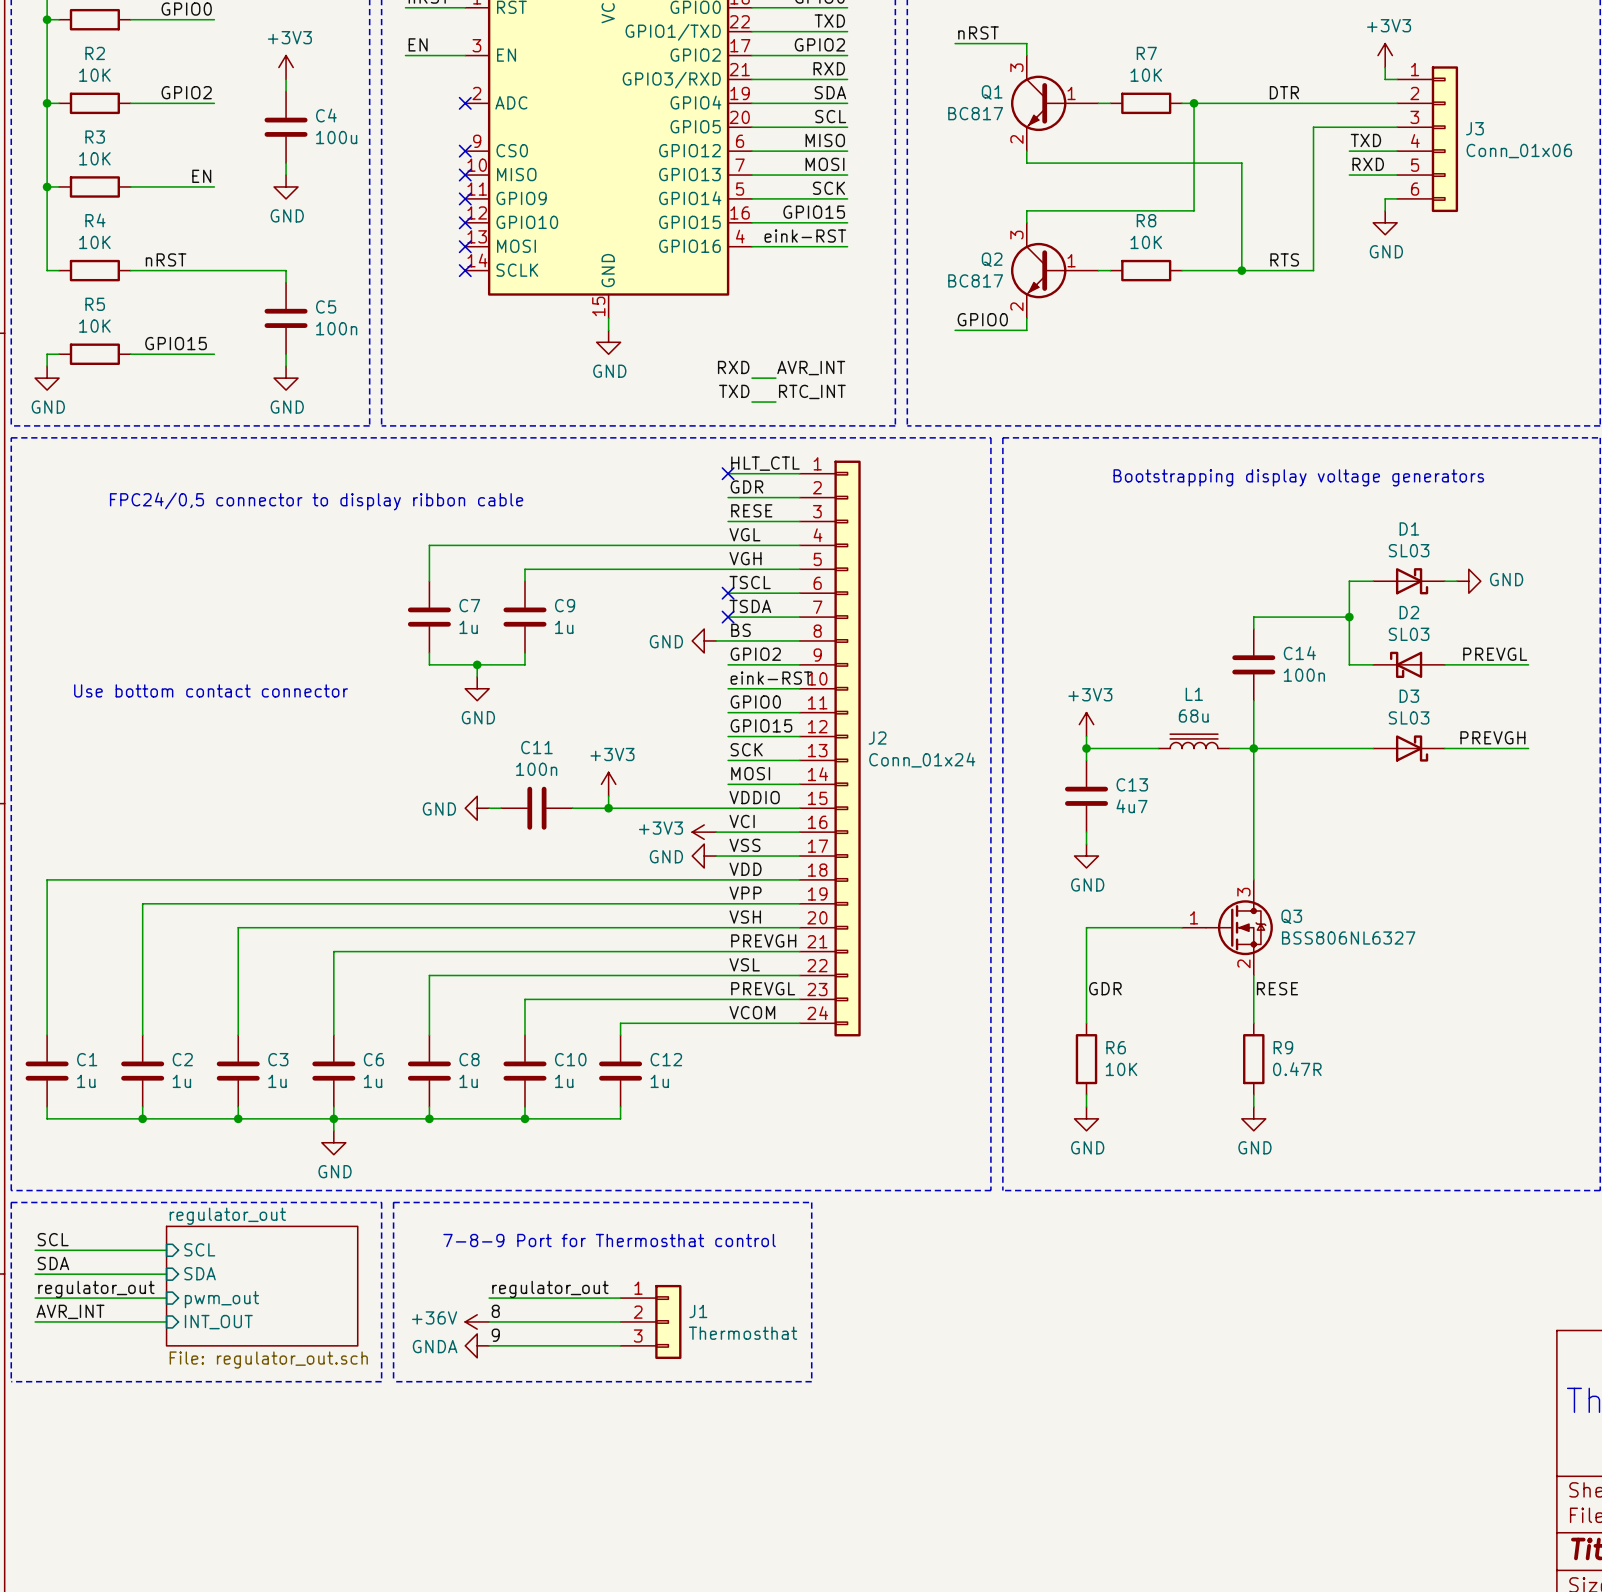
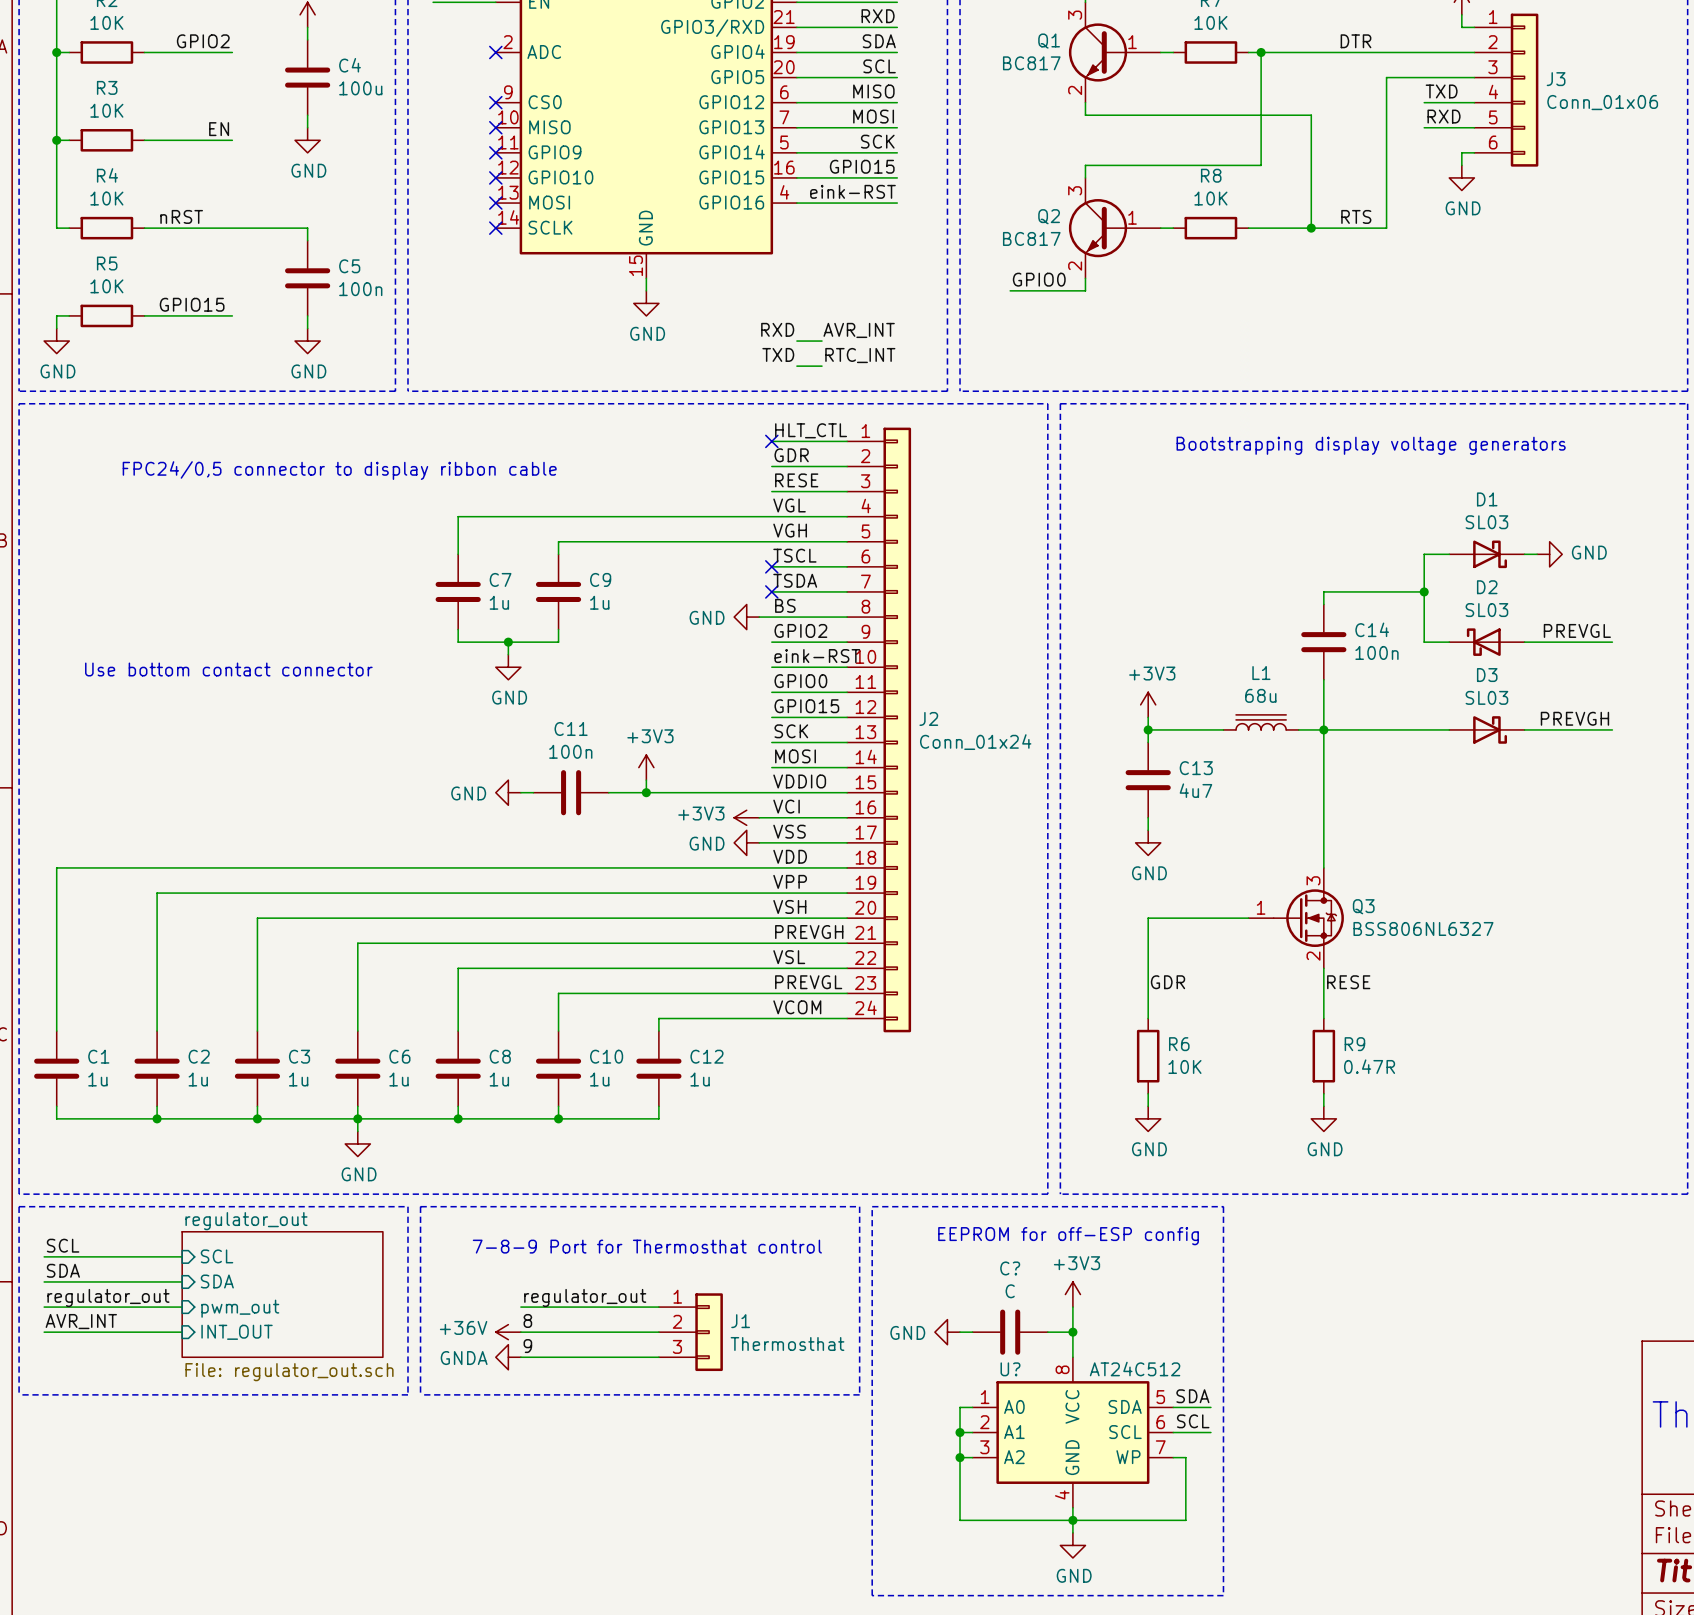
line: none -> (872, 1206) (872, 1595) (1223, 1595) (1223, 1206) (872, 1206)
text: none -> EEPROM for off-ESP config (1068, 1236)
power symbol: none -> +3V3 (1072, 1294)
wire: none -> (1072, 1307) (1072, 1357)
power symbol: none -> GND (947, 1332)
wire: none -> (960, 1332) (972, 1332)
C?: none -> C (1010, 1332)
wire: none -> (1047, 1332) (1072, 1332)
junction: none -> (1072, 1332)
label: none -> SDA (1192, 1396)
wire: none -> (972, 1407) (960, 1407) (960, 1520) (1185, 1520) (1185, 1457) (1173, 1457)
wire: none -> (1173, 1407) (1210, 1407)
label: none -> SCL (1193, 1421)
wire: none -> (960, 1432) (972, 1432)
junction: none -> (960, 1432)
U?: none -> AT24C512 (1072, 1432)
wire: none -> (1173, 1432) (1210, 1432)
wire: none -> (960, 1457) (972, 1457)
junction: none -> (960, 1457)
wire: none -> (1072, 1507) (1072, 1532)
junction: none -> (1072, 1520)
power symbol: none -> GND (1072, 1545)

